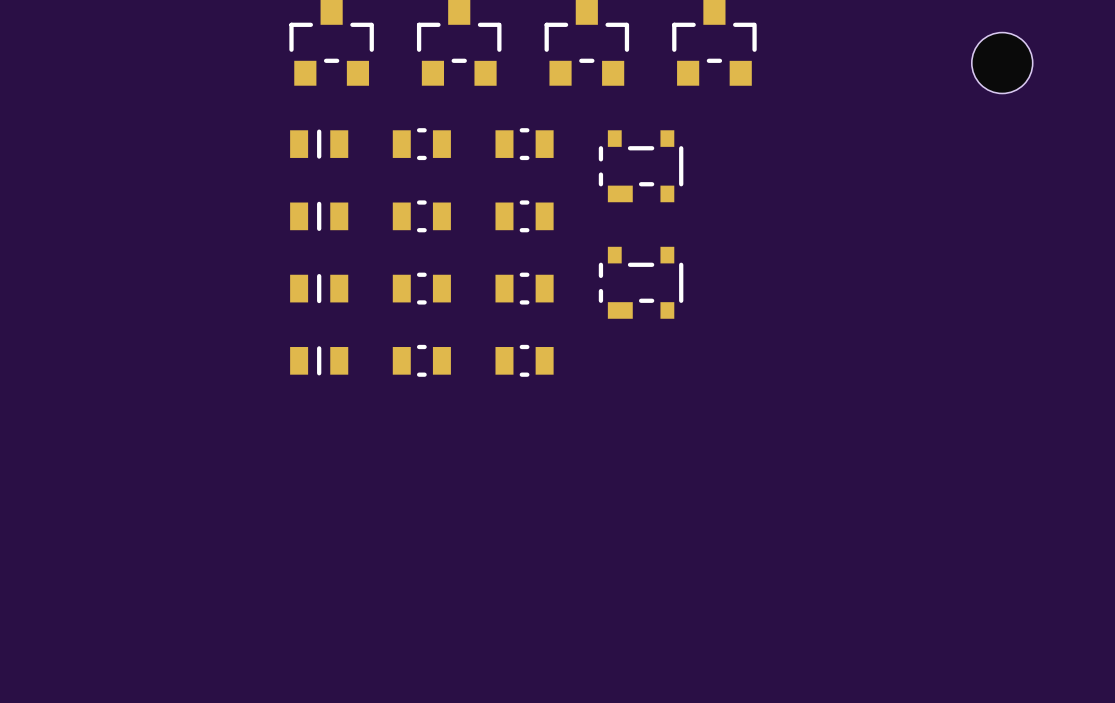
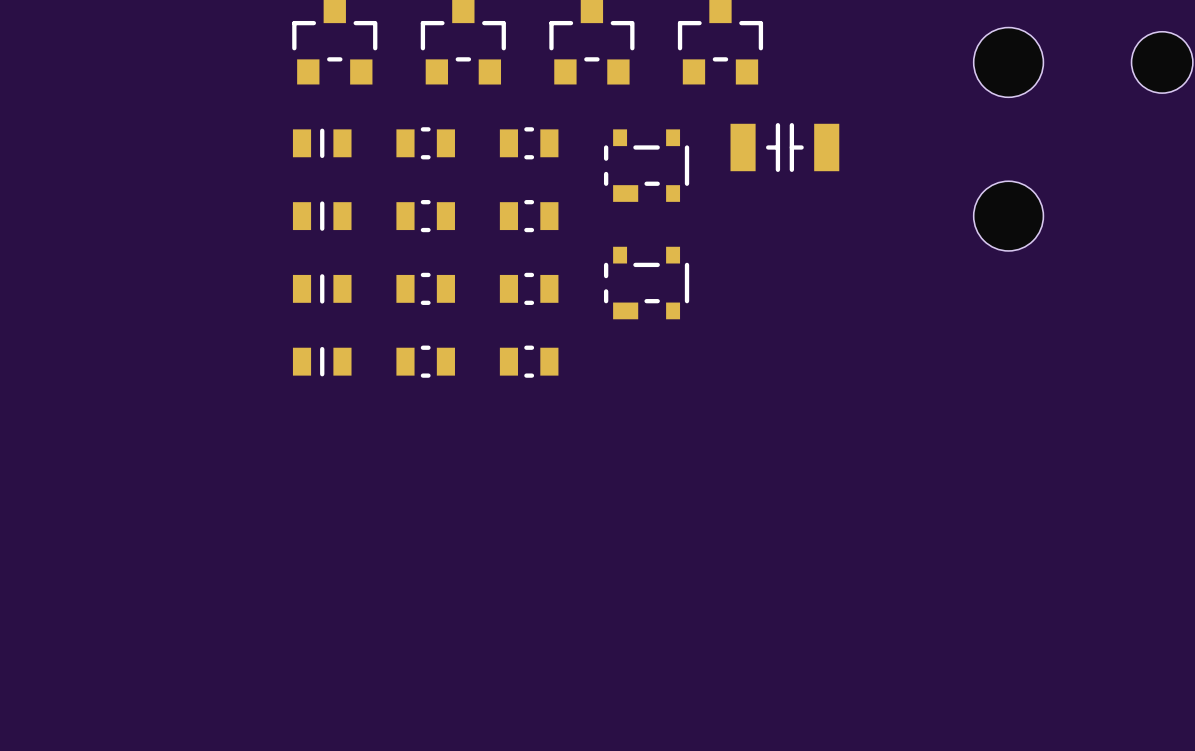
part footprint: [971, 32, 1033, 94] -> [973, 27, 1044, 98]
part: none -> (784, 147)
part: none -> (1008, 216)

